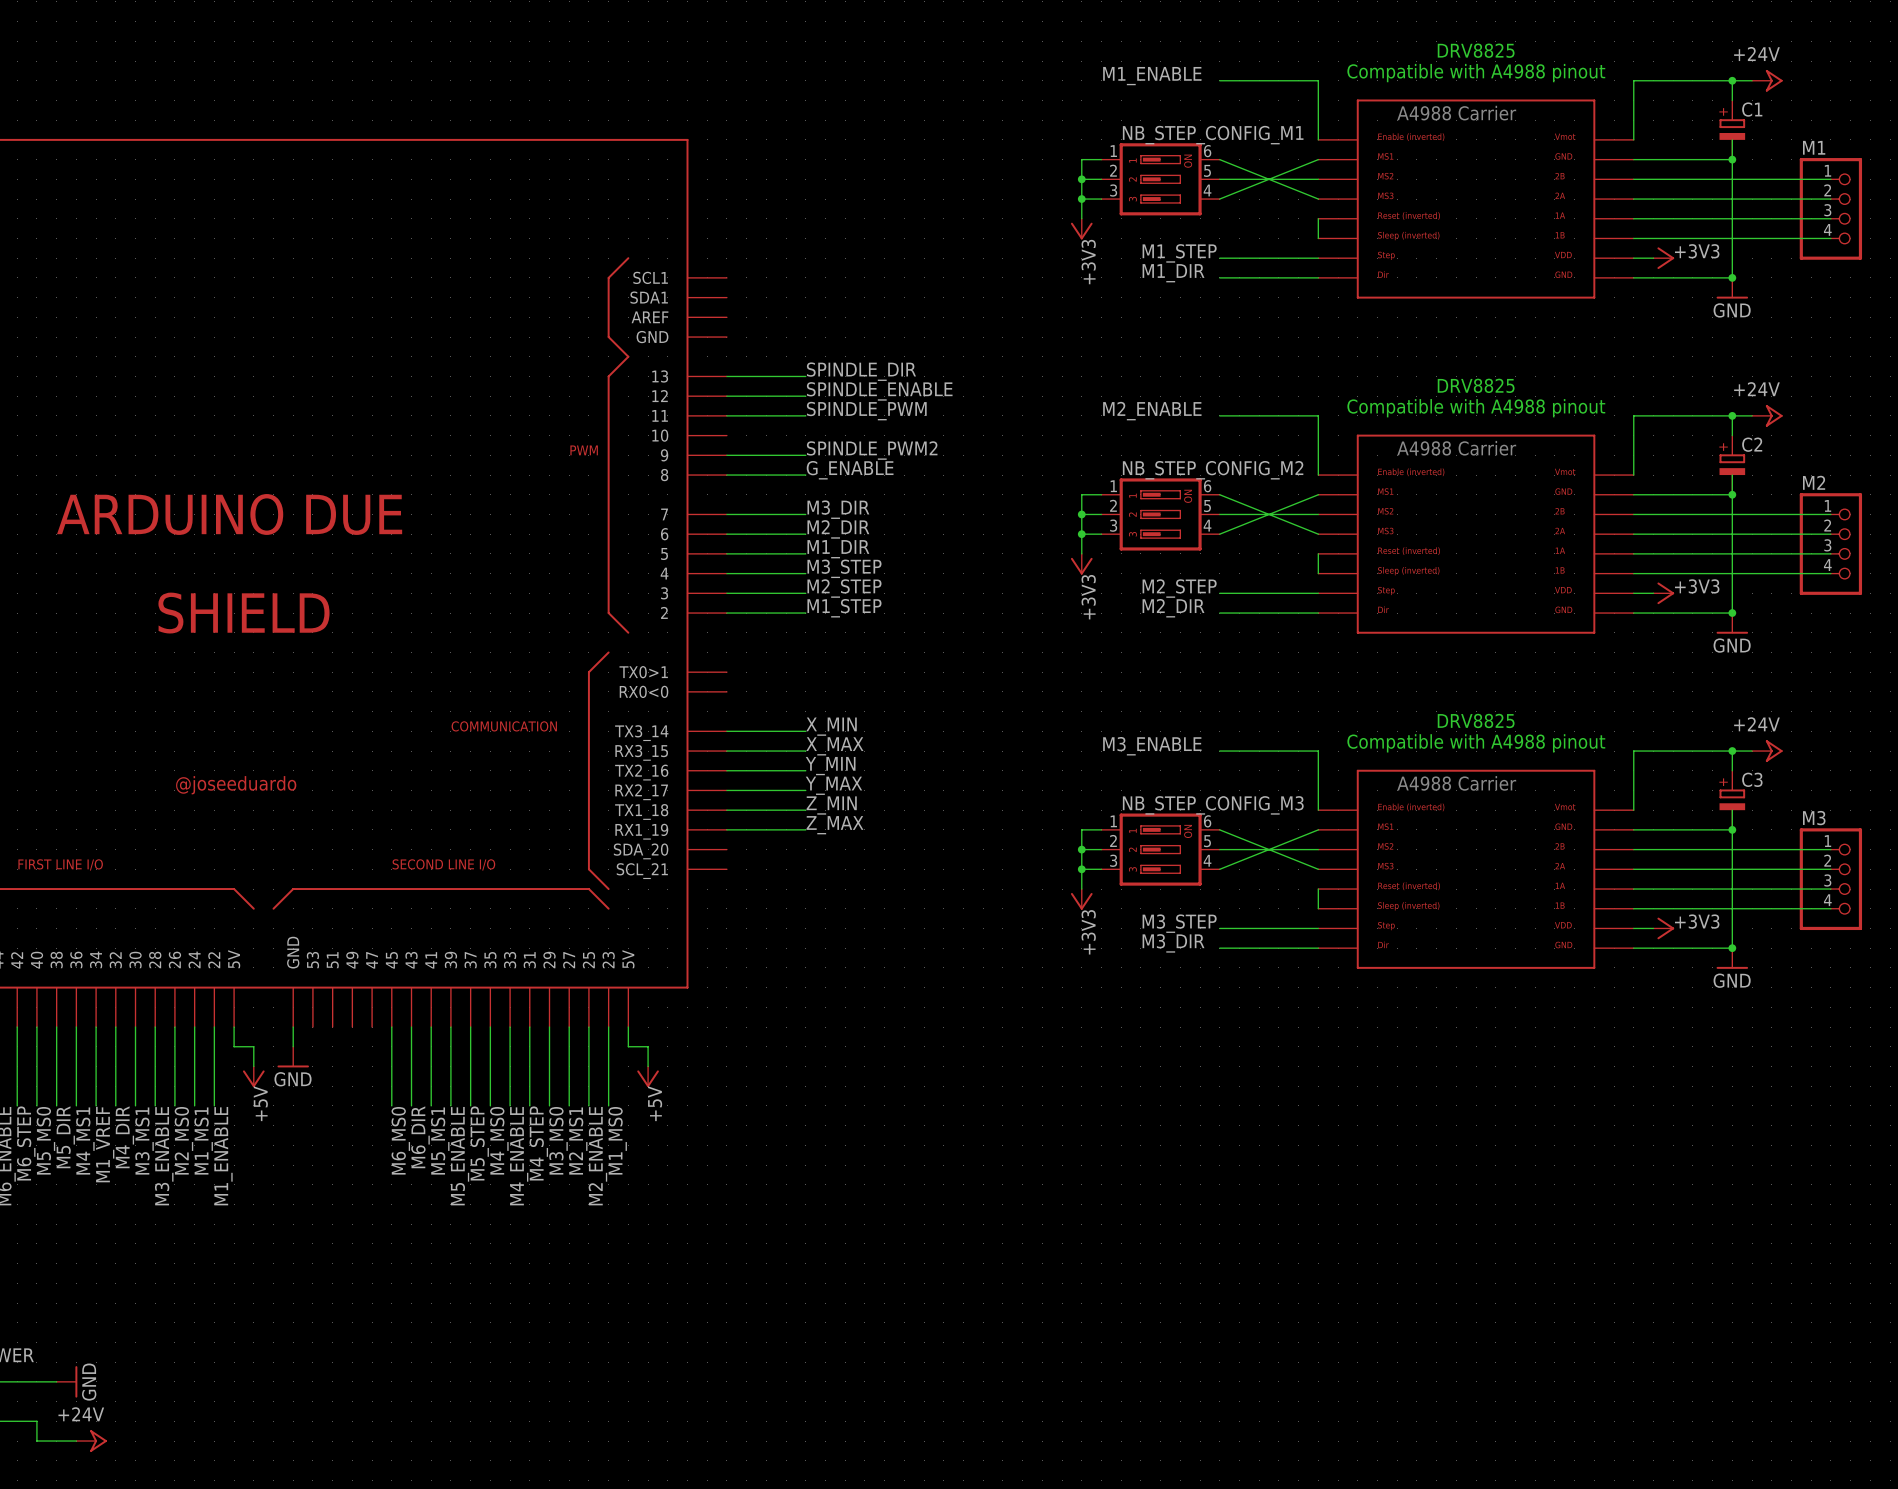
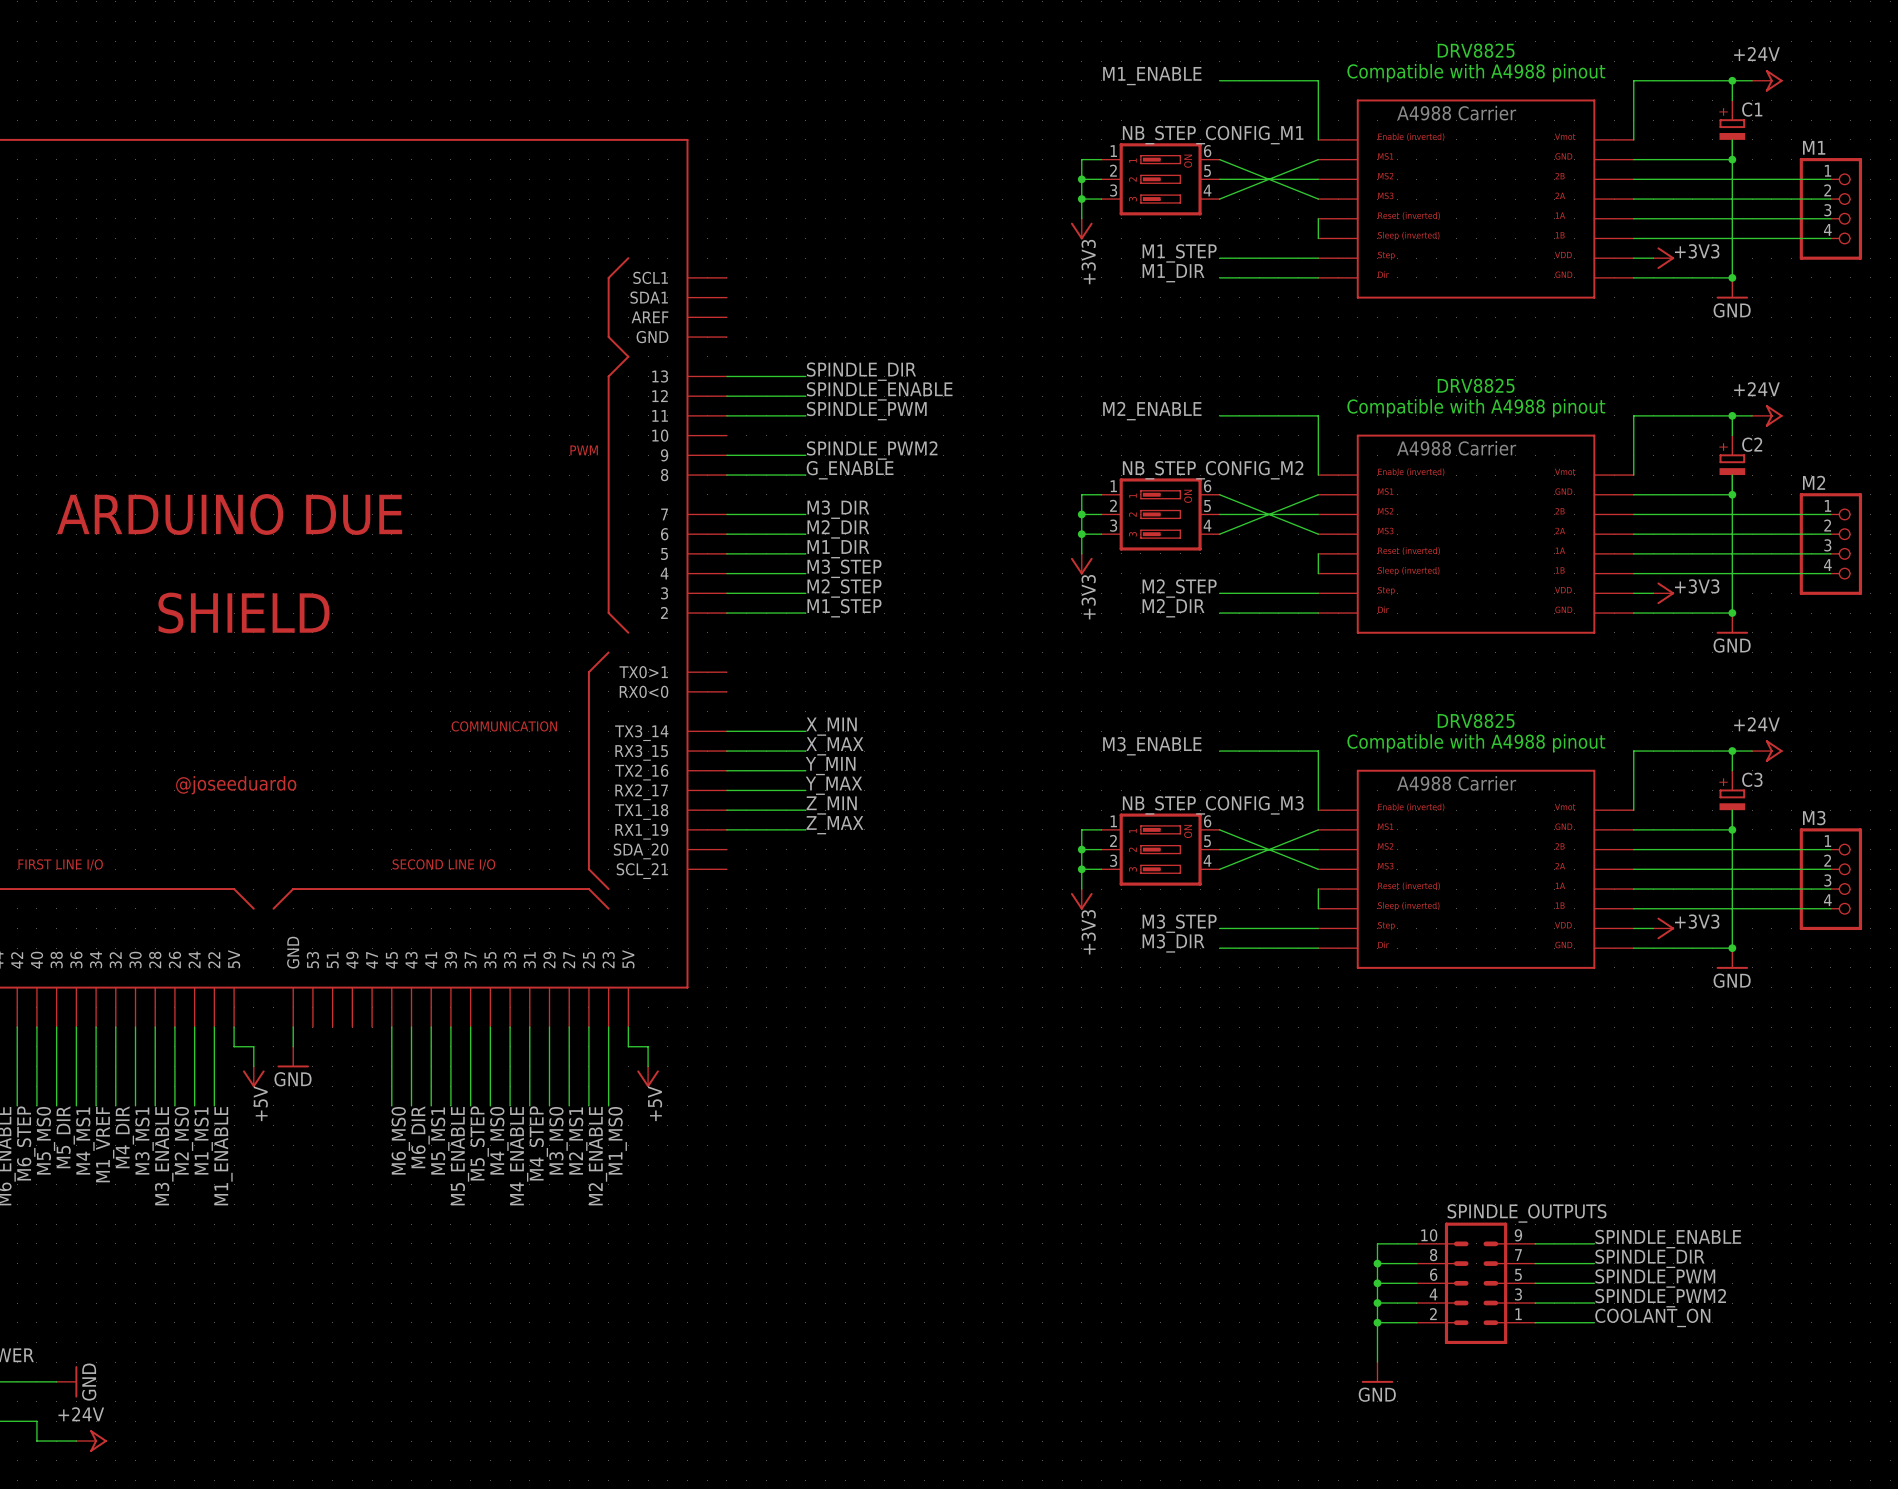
label: none -> SPINDLE_ENABLE (1668, 1239)
wire: none -> (1416, 1243) (1377, 1243) (1377, 1362)
wire: none -> (1535, 1243) (1594, 1243)
label: none -> SPINDLE_DIR (1650, 1258)
wire: none -> (1377, 1263) (1416, 1263)
junction: none -> (1377, 1263)
wire: none -> (1535, 1263) (1594, 1263)
label: none -> SPINDLE_PWM (1655, 1278)
wire: none -> (1377, 1283) (1416, 1283)
junction: none -> (1377, 1283)
SPINDLE_OUTPUTS: none -> (1476, 1283)
wire: none -> (1535, 1283) (1594, 1283)
label: none -> SPINDLE_PWM2 (1660, 1298)
wire: none -> (1377, 1303) (1416, 1303)
junction: none -> (1377, 1303)
wire: none -> (1535, 1303) (1594, 1303)
label: none -> COOLANT_ON (1652, 1317)
wire: none -> (1377, 1322) (1416, 1322)
junction: none -> (1377, 1322)
wire: none -> (1535, 1322) (1594, 1322)
power symbol: none -> GND (1377, 1372)

